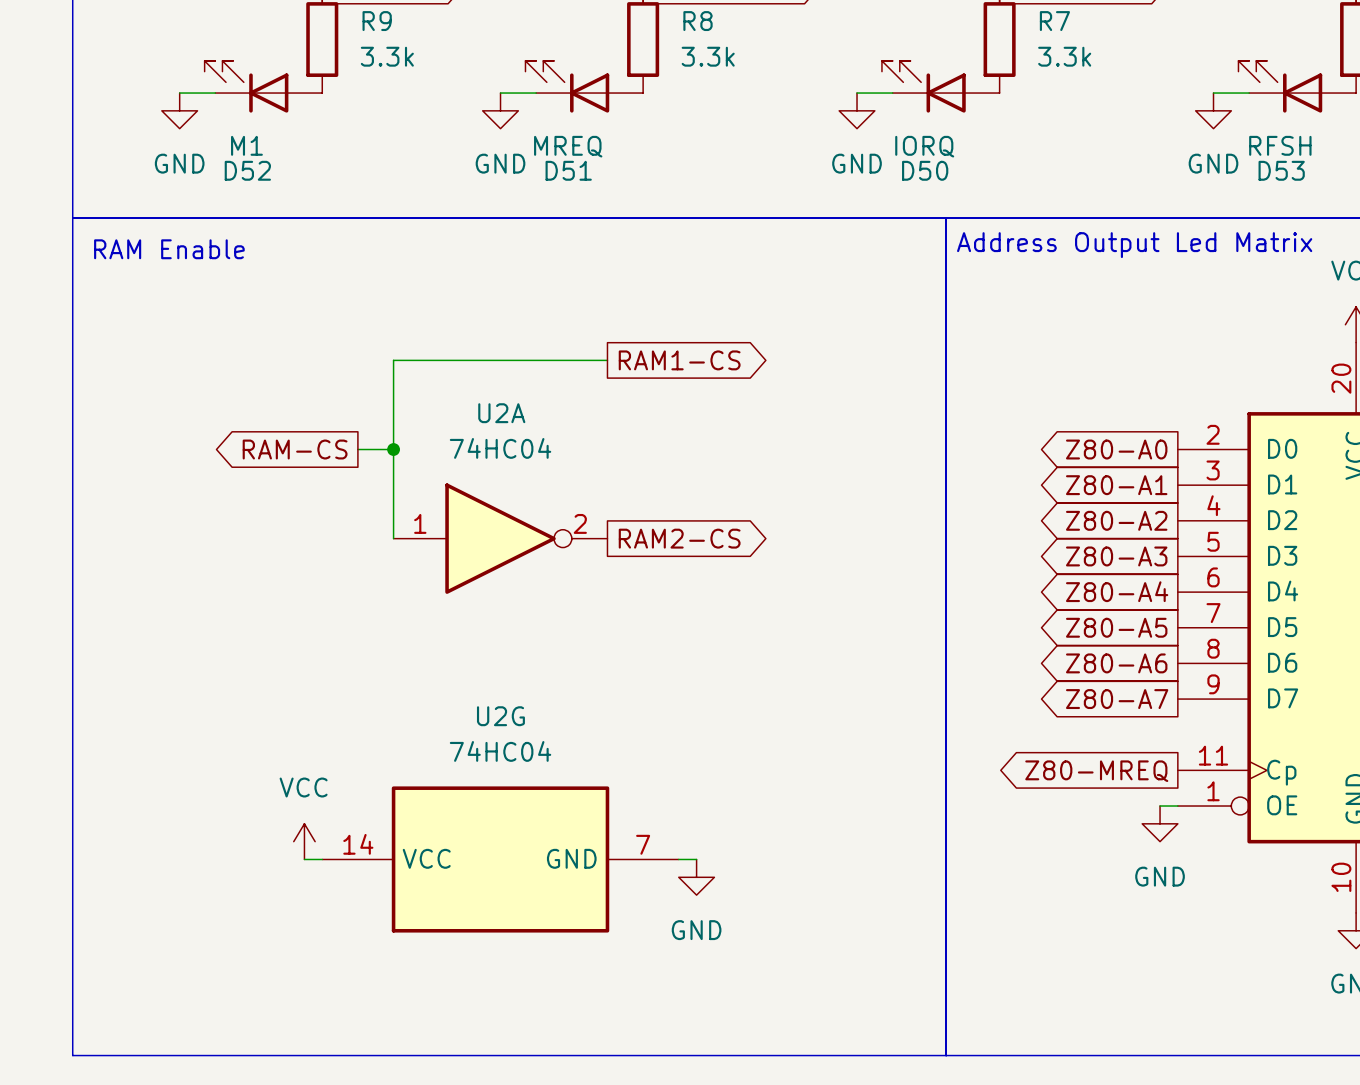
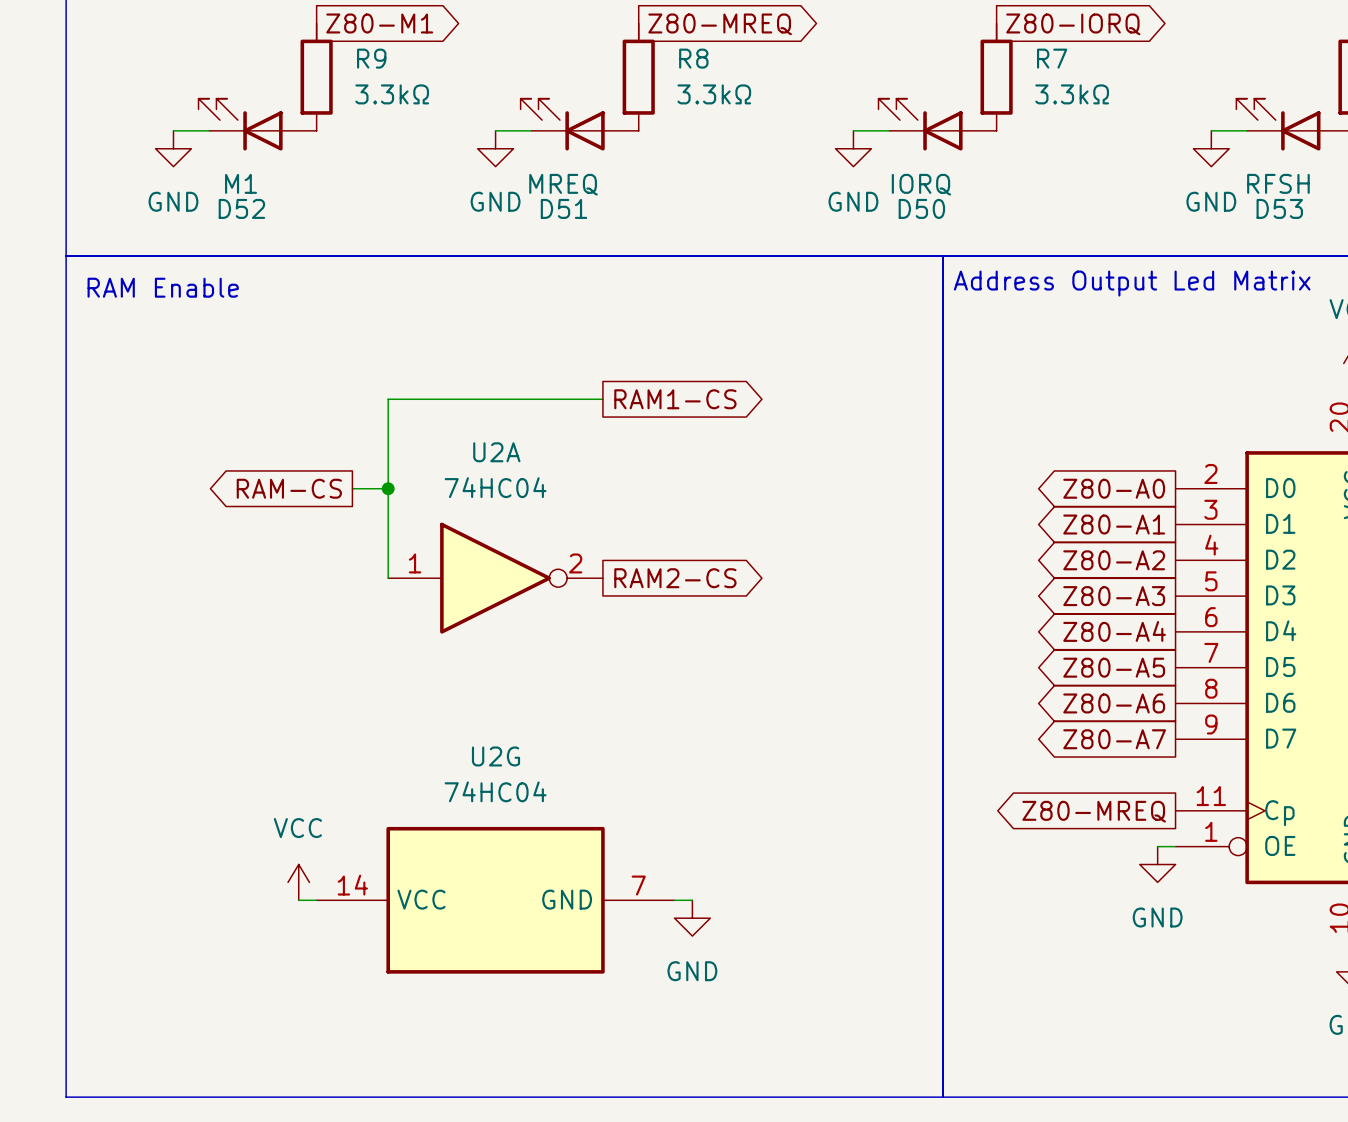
R9 value: 3.3k (387, 56) -> 3.3kΩ (392, 94)
R8 value: 3.3k (708, 56) -> 3.3kΩ (714, 94)
R7 value: 3.3k (1064, 56) -> 3.3kΩ (1072, 94)

